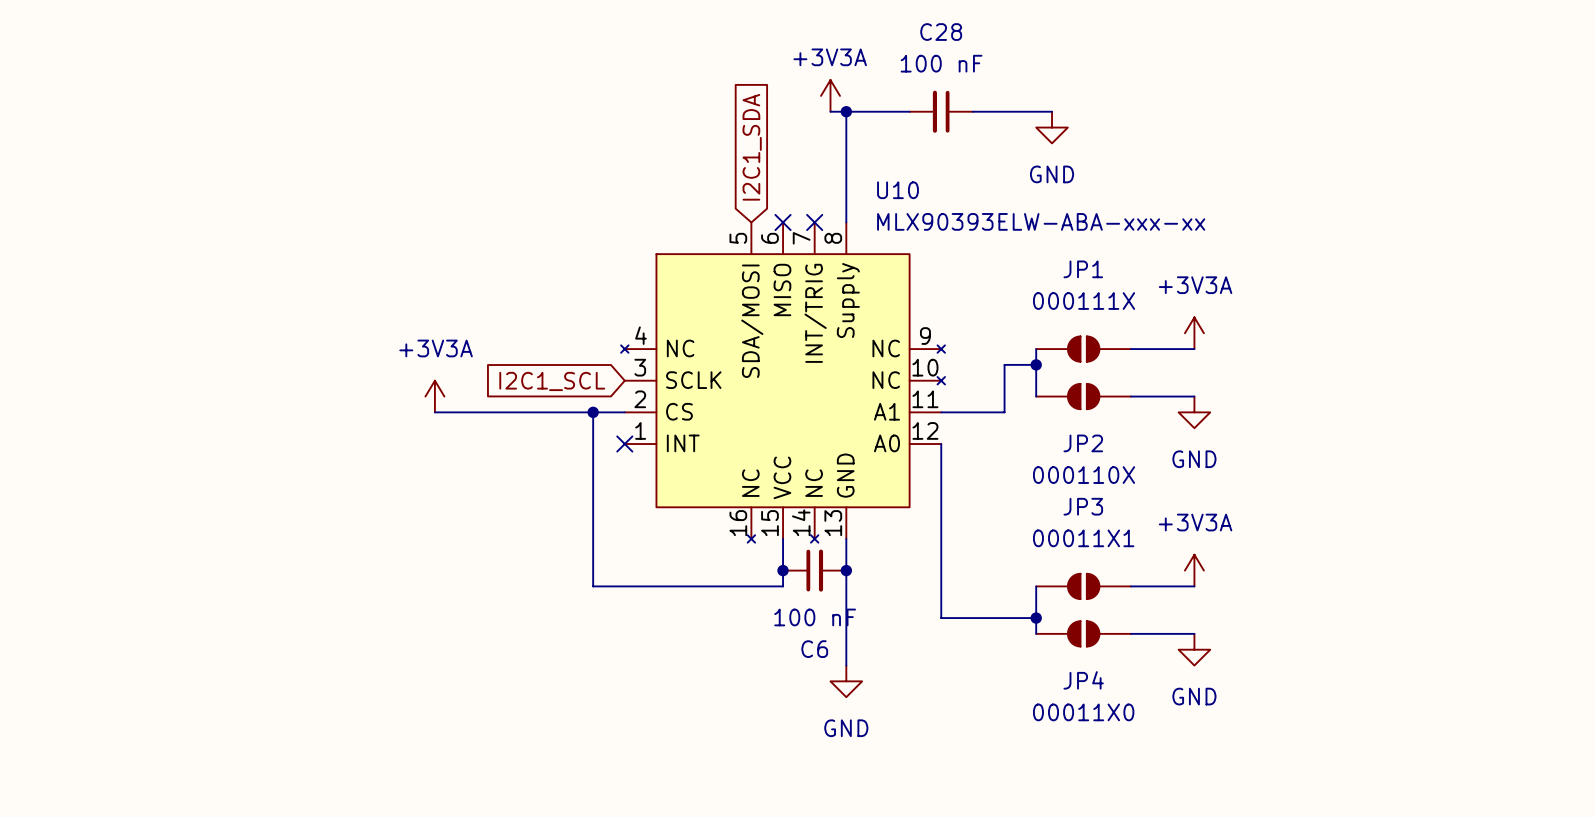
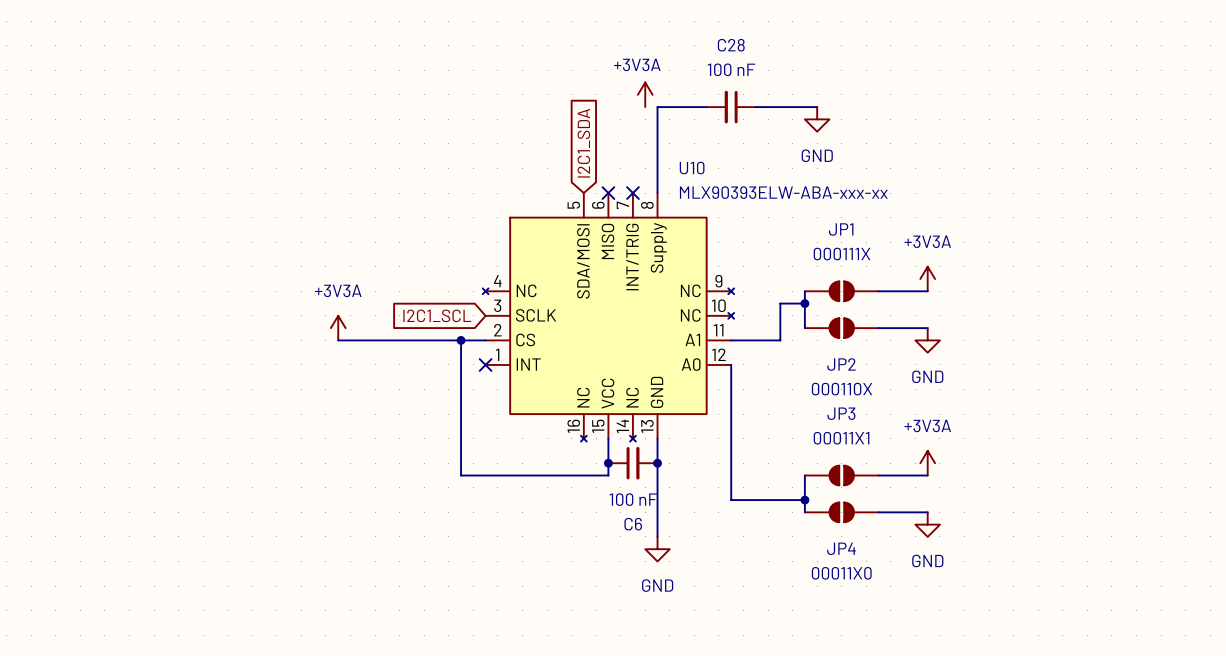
wire: (830, 111) (846, 111) -> none
junction: (846, 111) -> none

